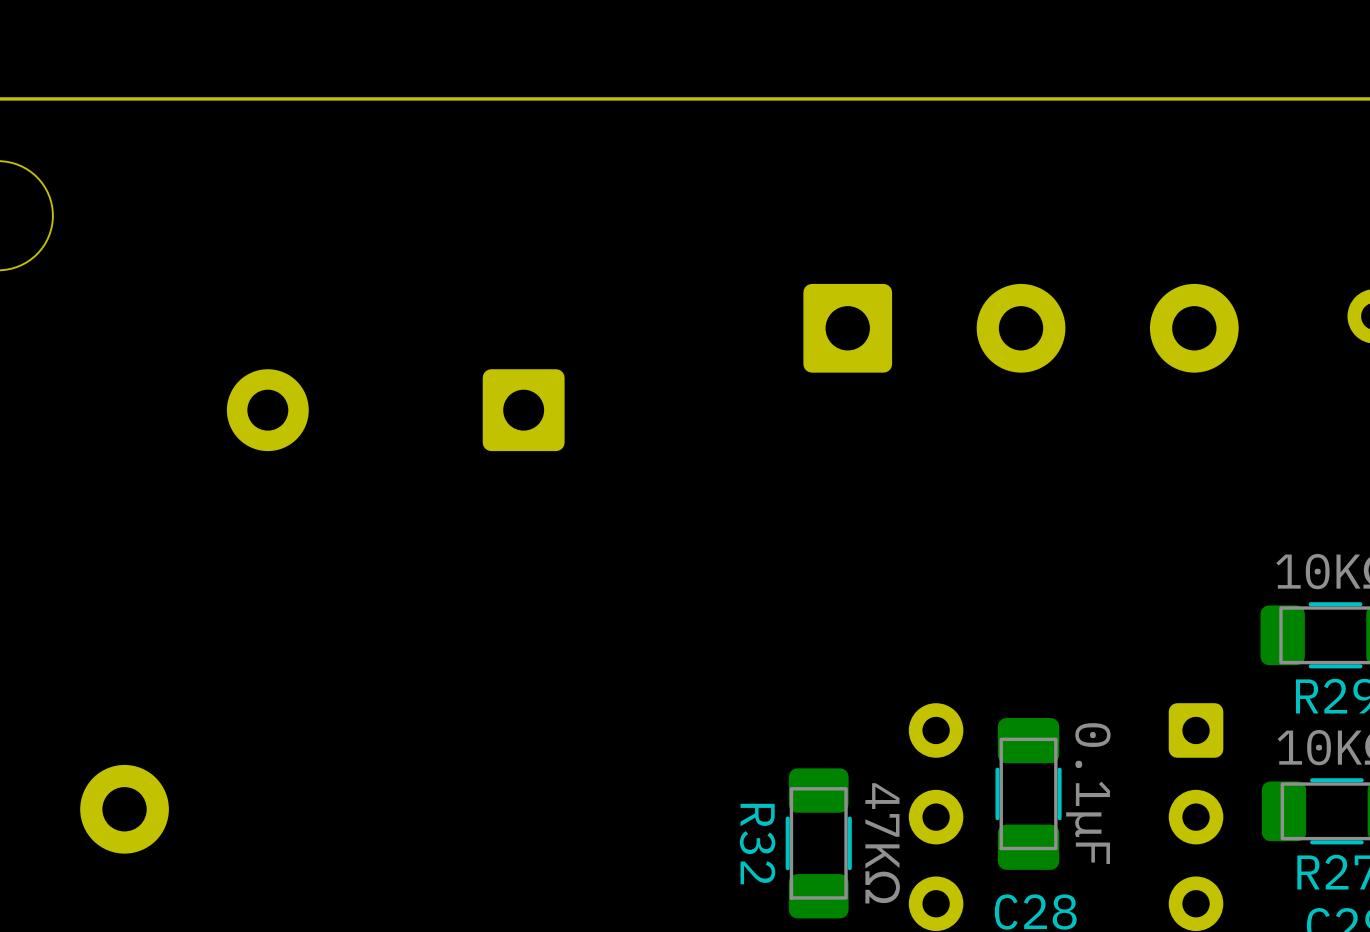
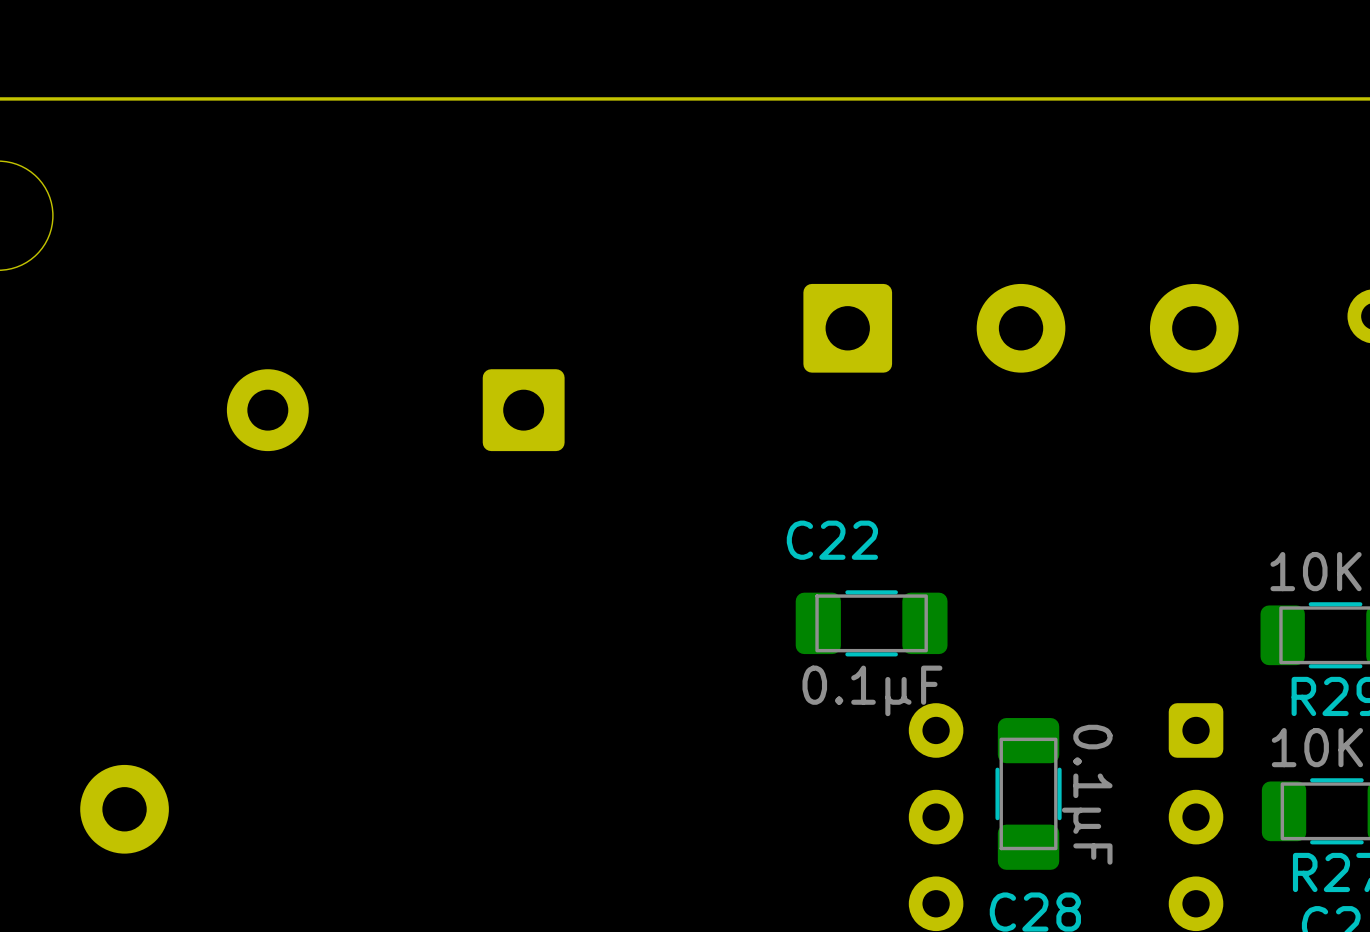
C22: none -> 0.1μF (871, 623)
R32: 47KΩ (818, 843) -> none

